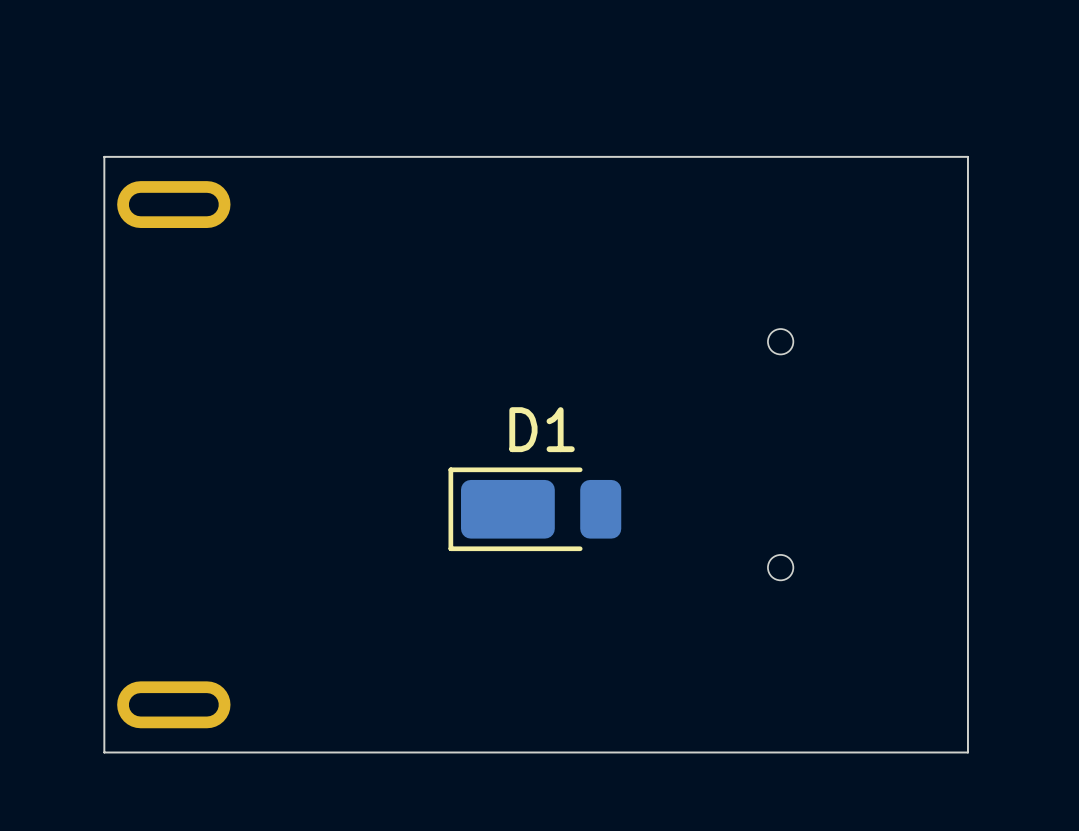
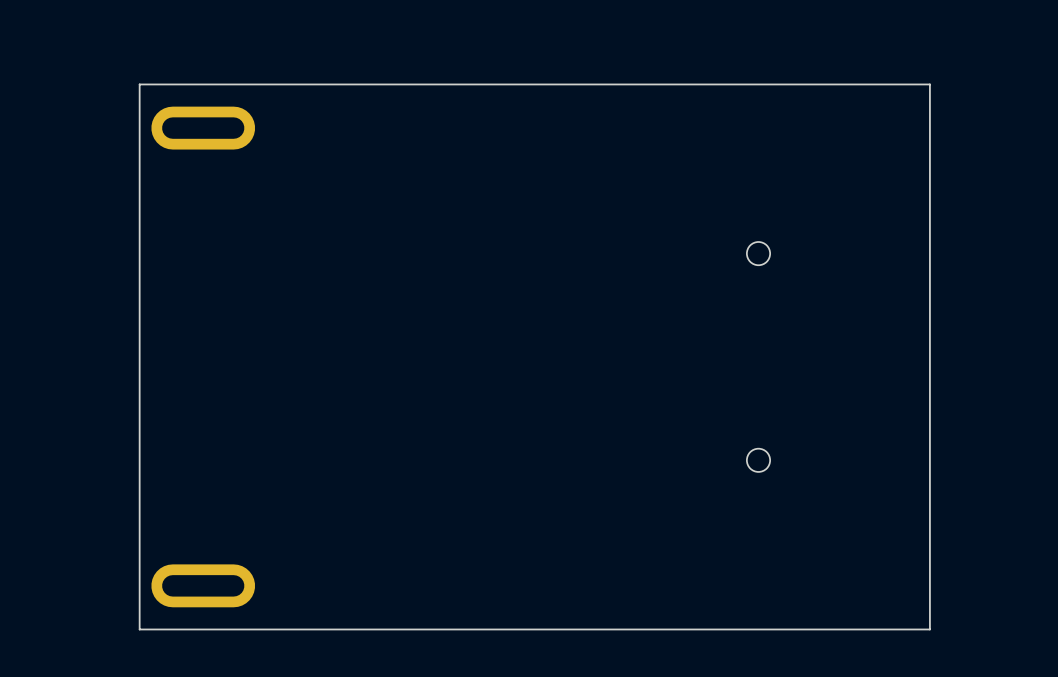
D1: (534, 509) -> none

